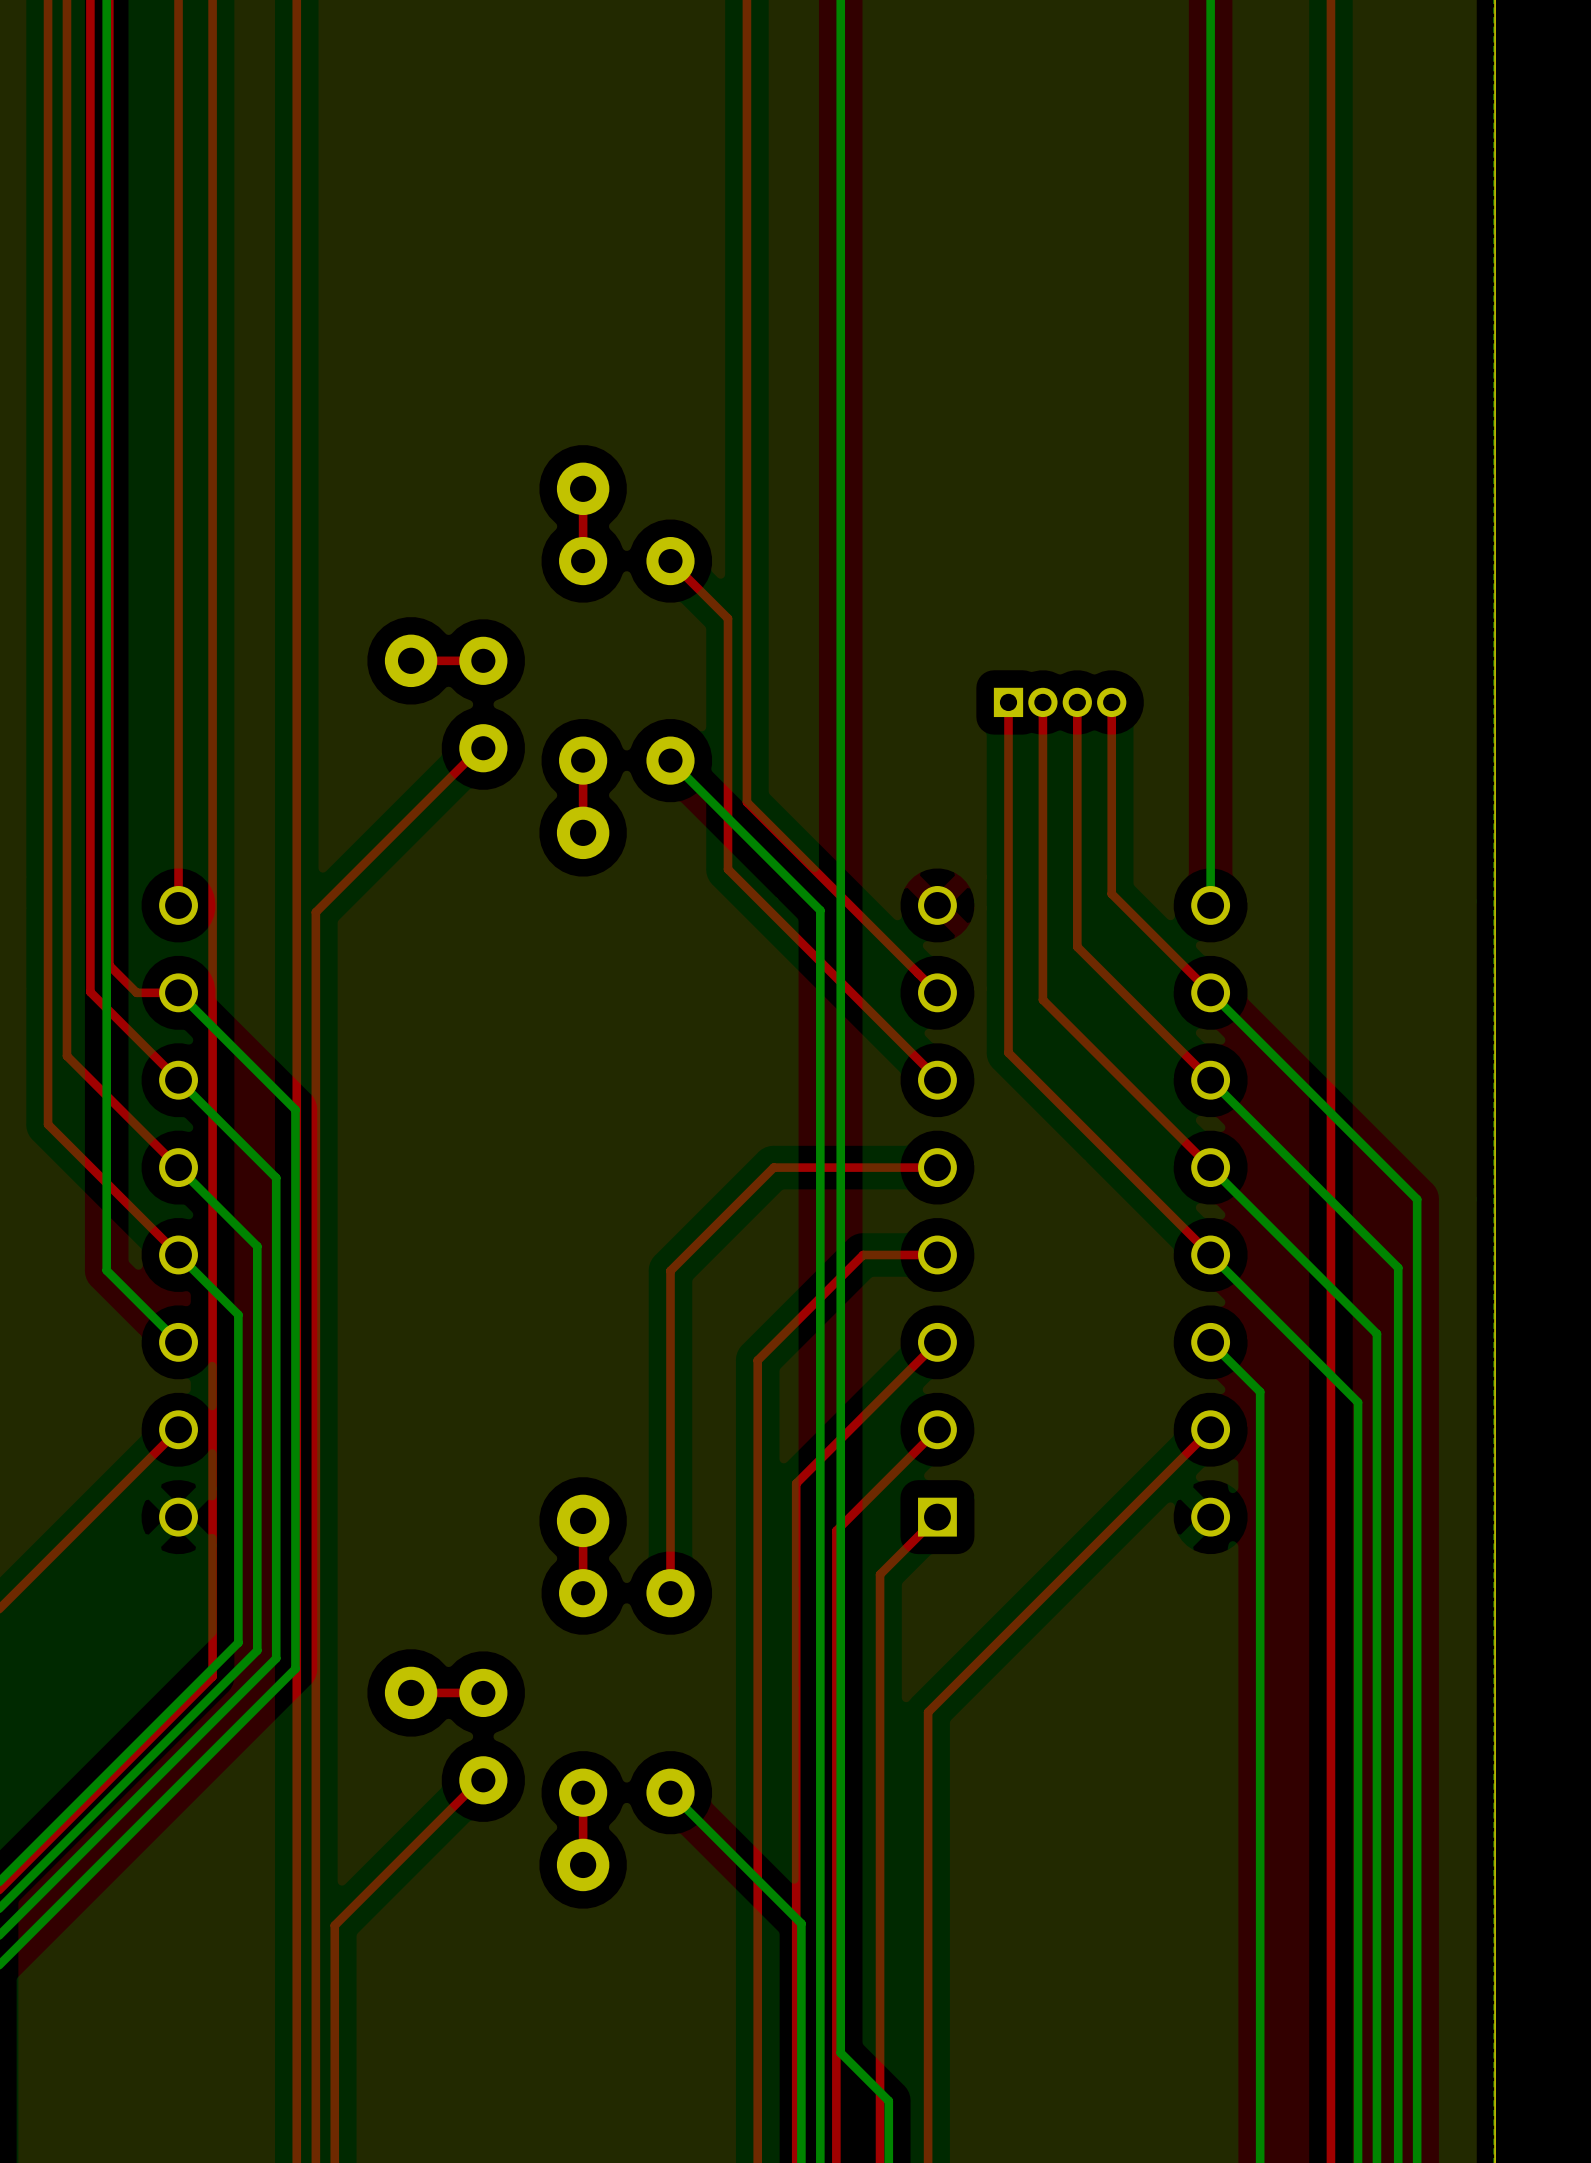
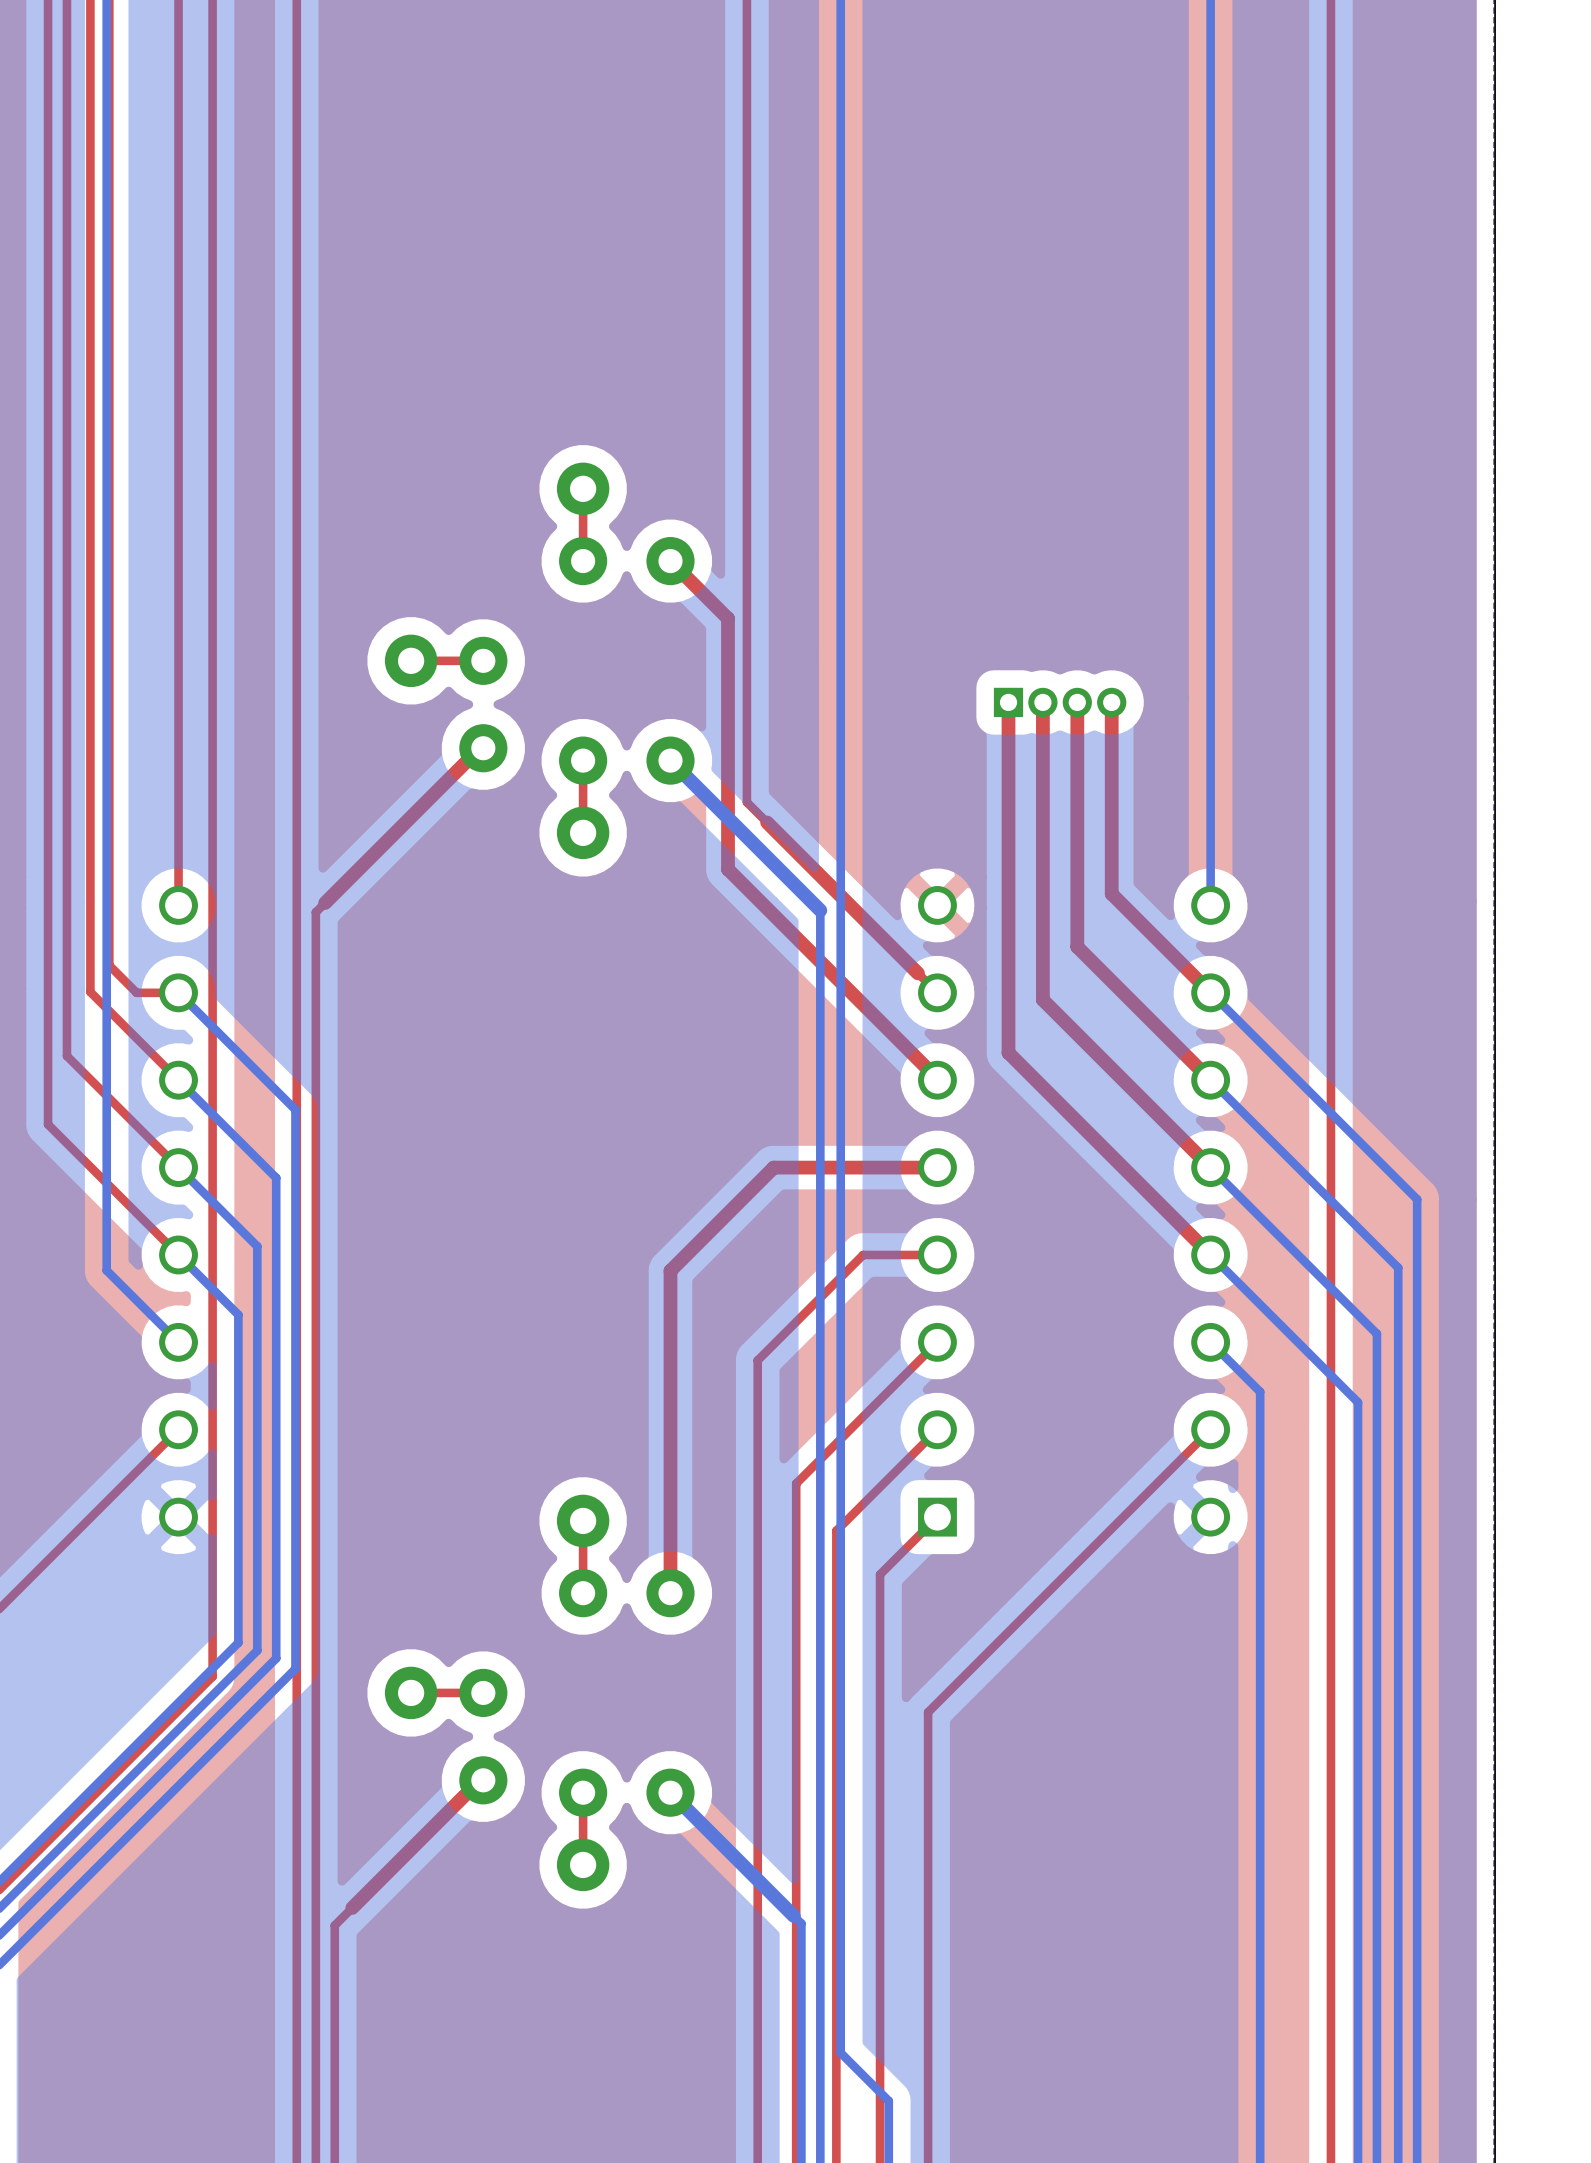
top track width: thin (670, 561) (728, 618) (728, 869) (937, 1078) -> thick (670, 561) (728, 618) (728, 869) (937, 1078)
top track width: thin (1008, 702) (1008, 1052) (1210, 1254) -> thick (1008, 702) (1008, 1052) (1210, 1254)
top track width: thin (1042, 702) (1042, 999) (1210, 1167) -> thick (1042, 702) (1042, 999) (1210, 1167)
top track width: thin (1077, 702) (1077, 946) (1210, 1080) -> thick (1077, 702) (1077, 946) (1210, 1080)
top track width: thin (1111, 702) (1111, 893) (1210, 992) -> thick (1111, 702) (1111, 893) (1210, 992)
top track width: thin (479, 748) (325, 902) -> thick (479, 748) (325, 902)
bottom track width: thin (670, 760) (820, 910) -> thick (670, 760) (820, 910)
top track width: thin (767, 822) (918, 973) -> thick (767, 822) (918, 973)
top track width: thin (937, 1167) (773, 1167) (670, 1270) (670, 1593) -> thick (937, 1167) (773, 1167) (670, 1270) (670, 1593)
top track width: thin (479, 1780) (352, 1907) -> thick (479, 1780) (352, 1907)
bottom track width: thin (670, 1792) (793, 1916) -> thick (670, 1792) (793, 1916)

